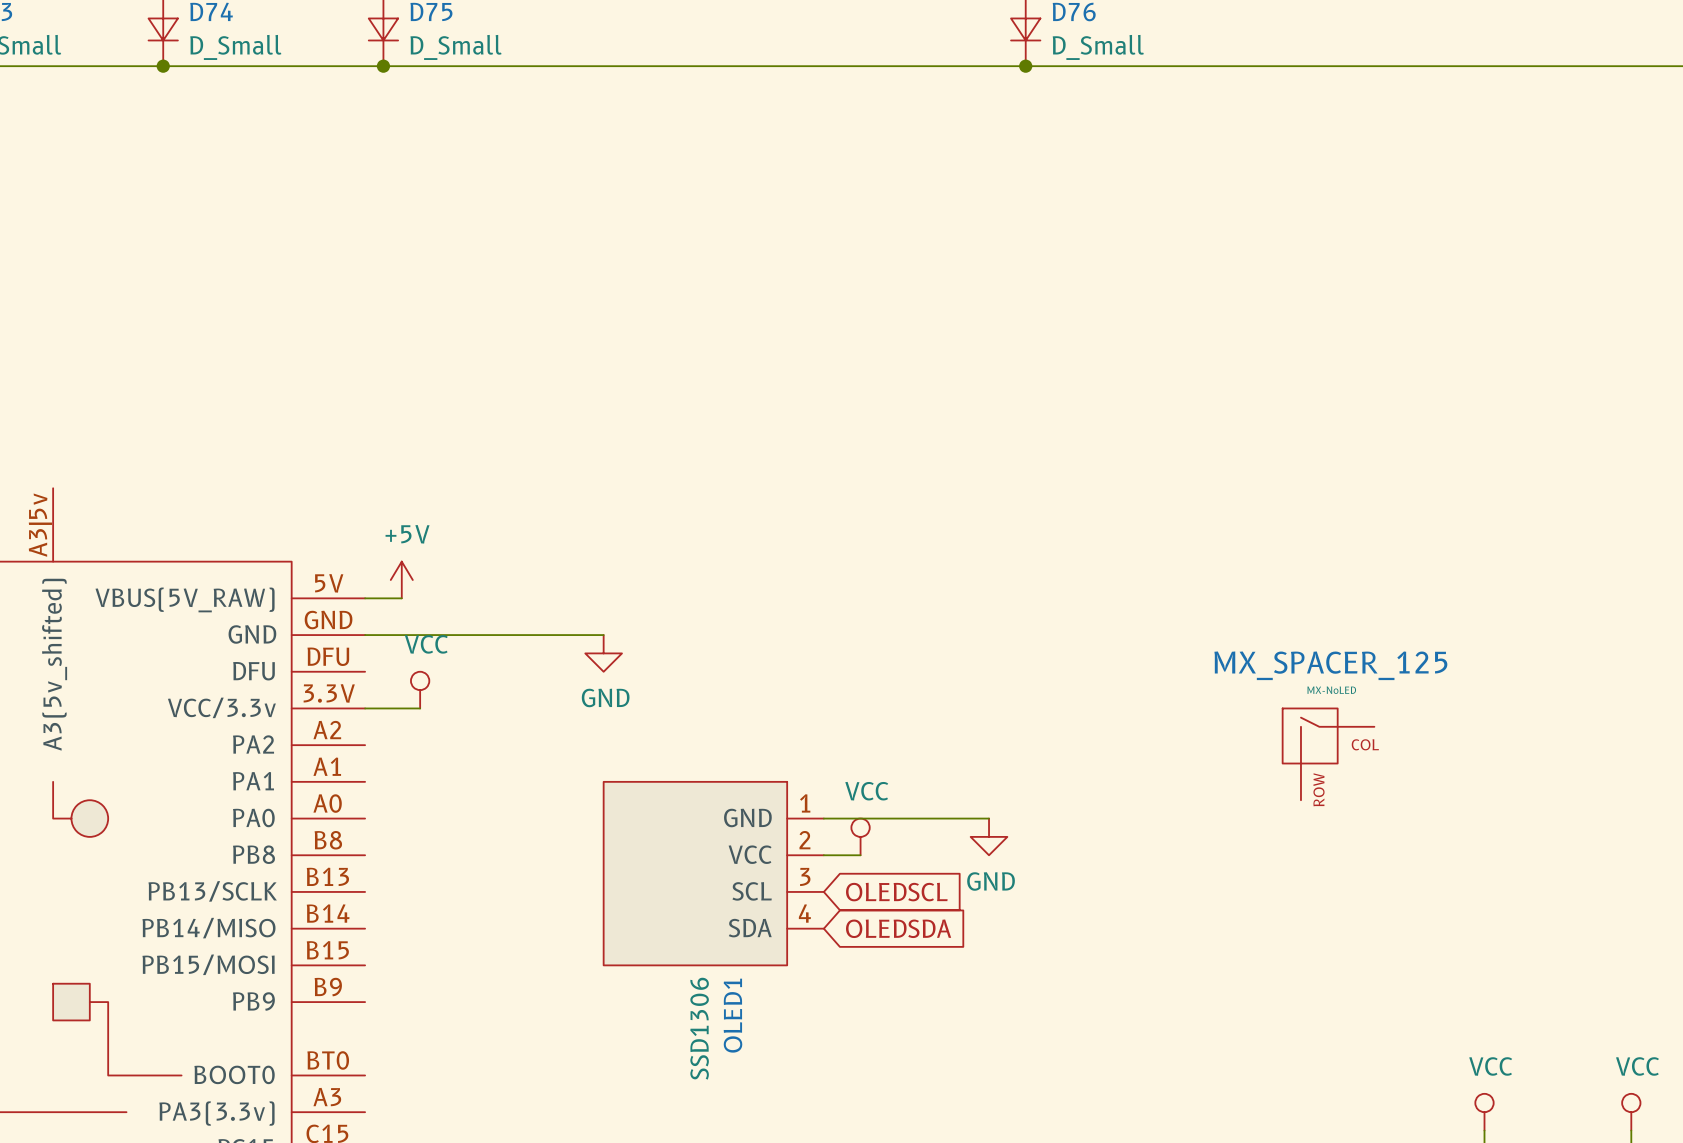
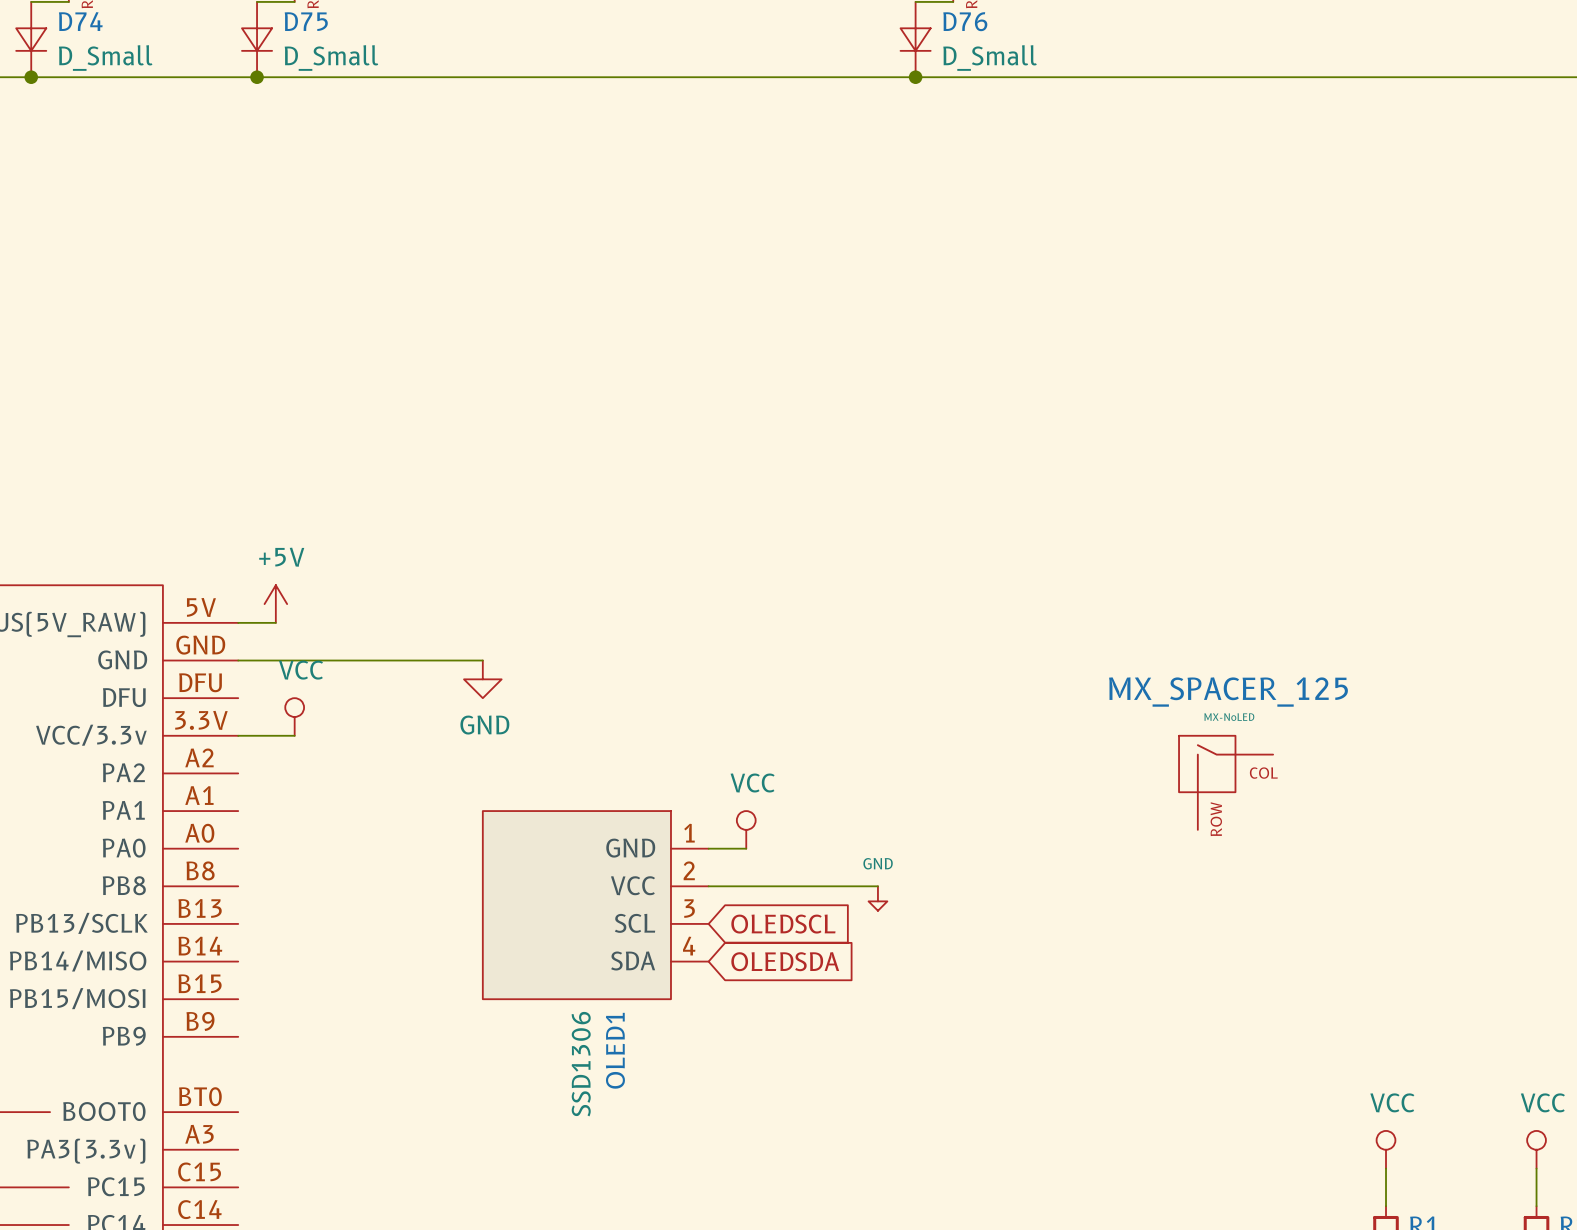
wire: (860, 818) (989, 818) -> (746, 886) (877, 886)
power symbol position: VCC (860, 836) -> VCC (746, 829)
power symbol: GND (989, 836) -> none
power symbol: none -> GND (877, 898)

